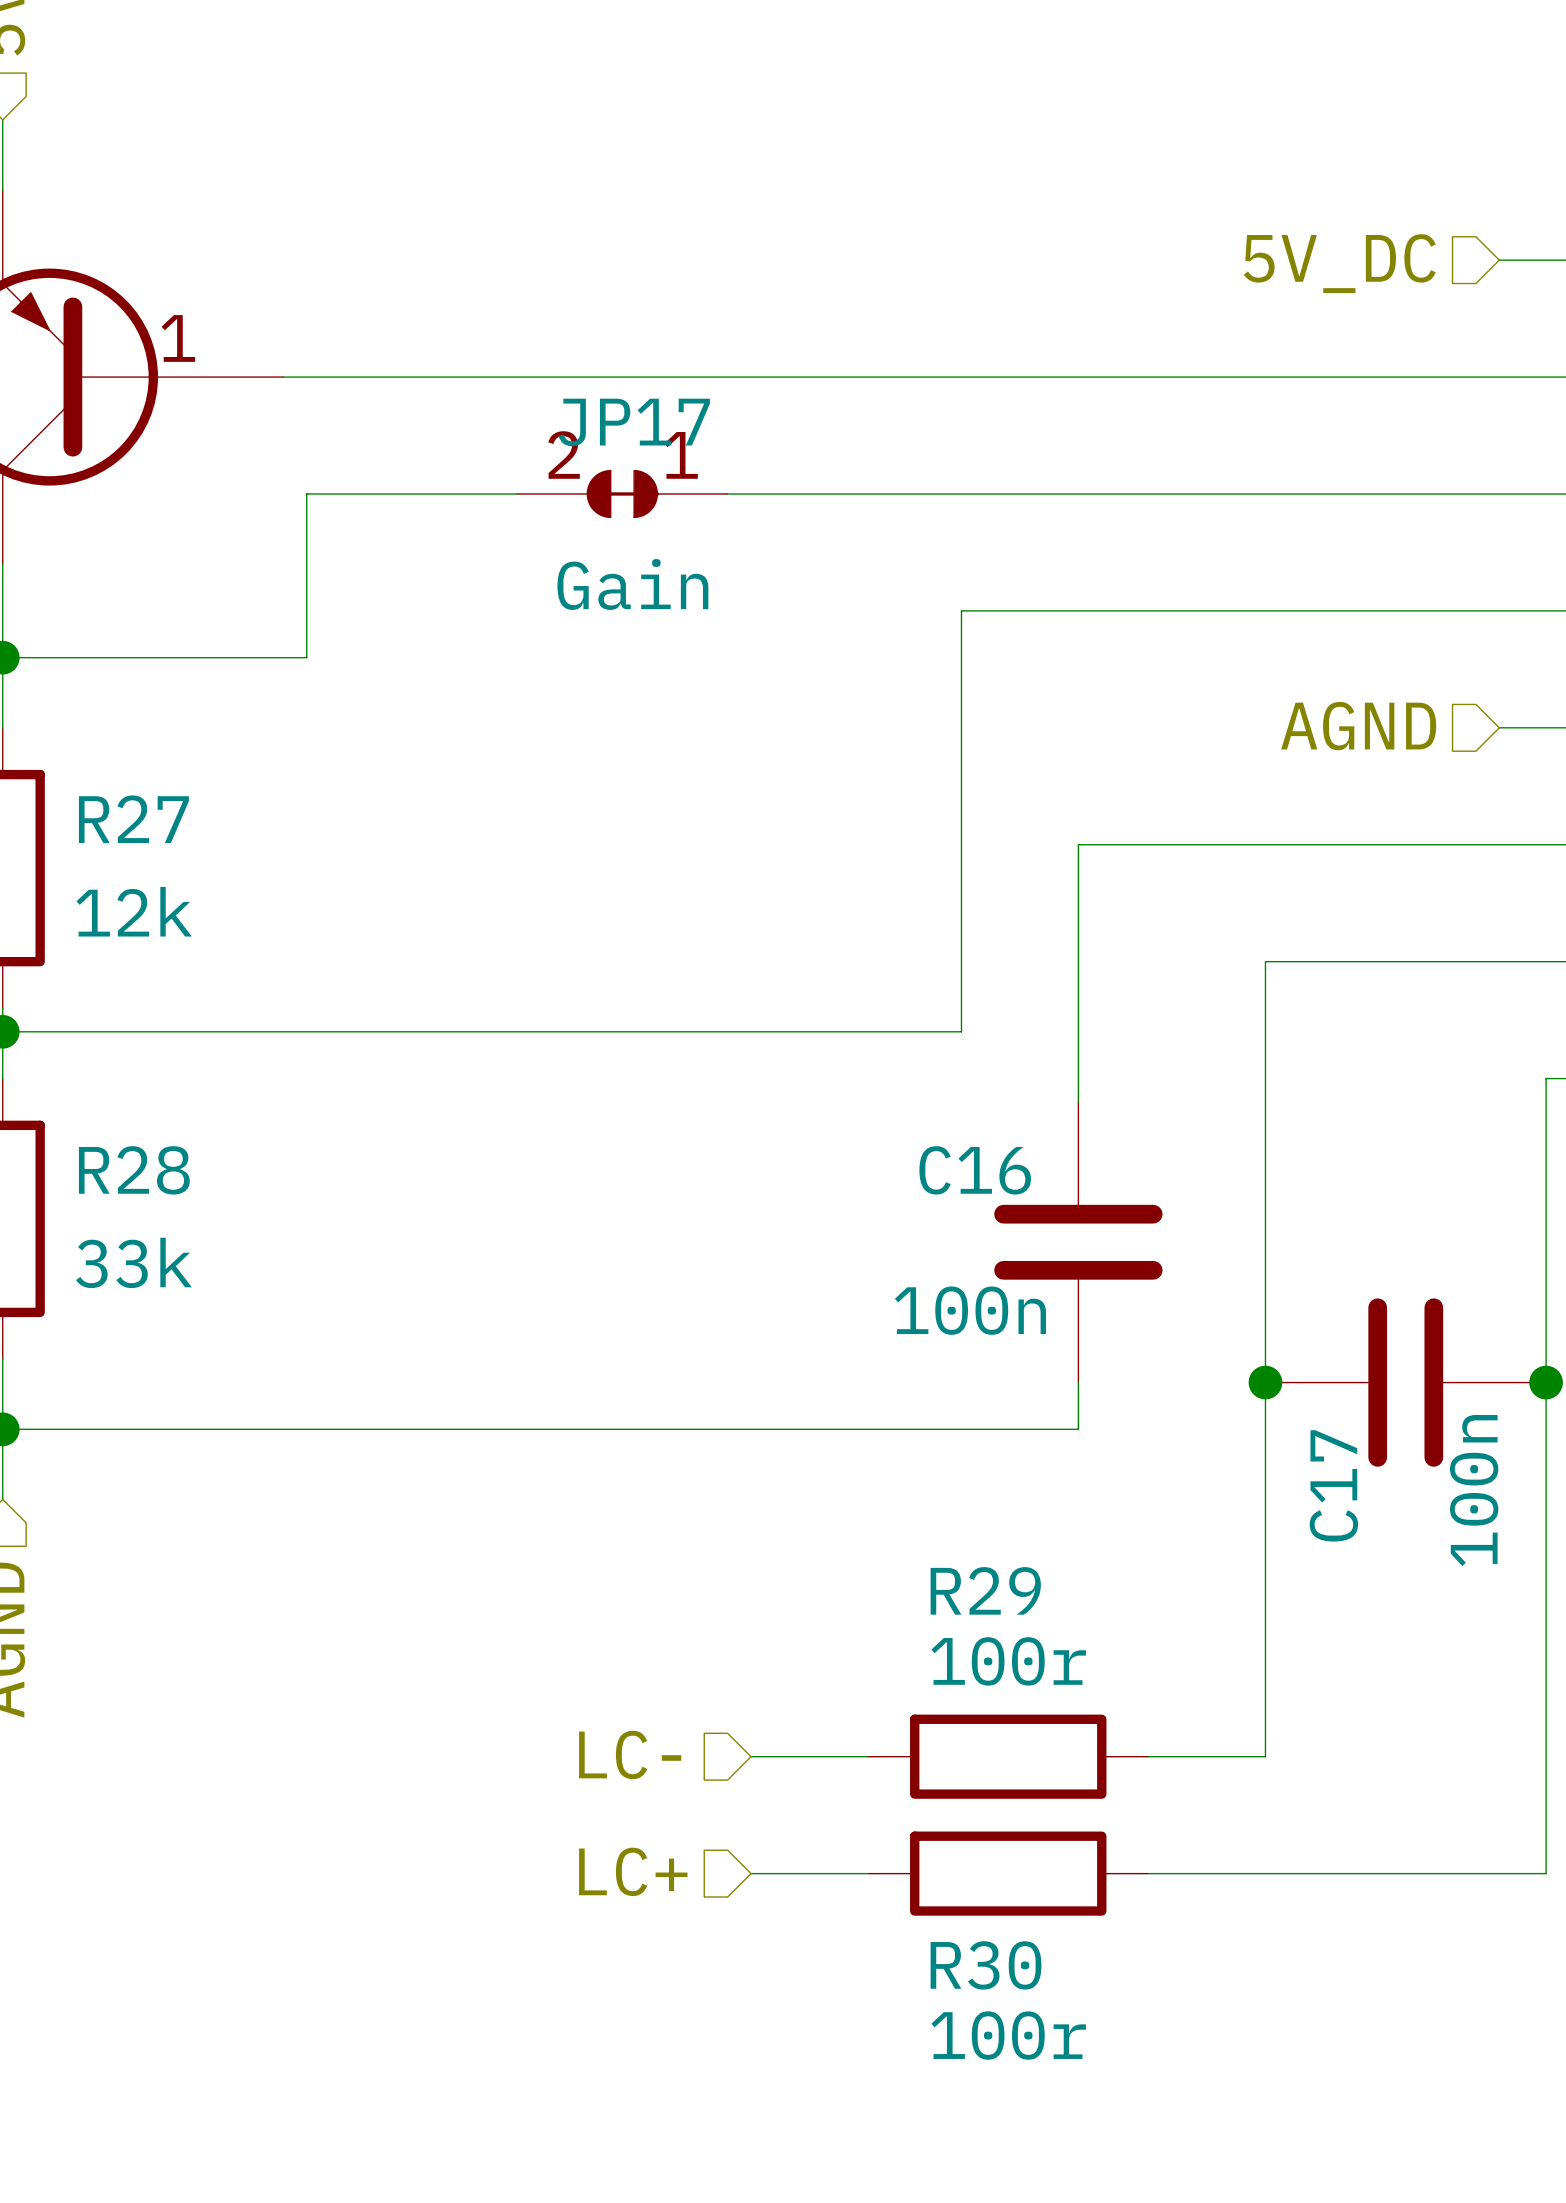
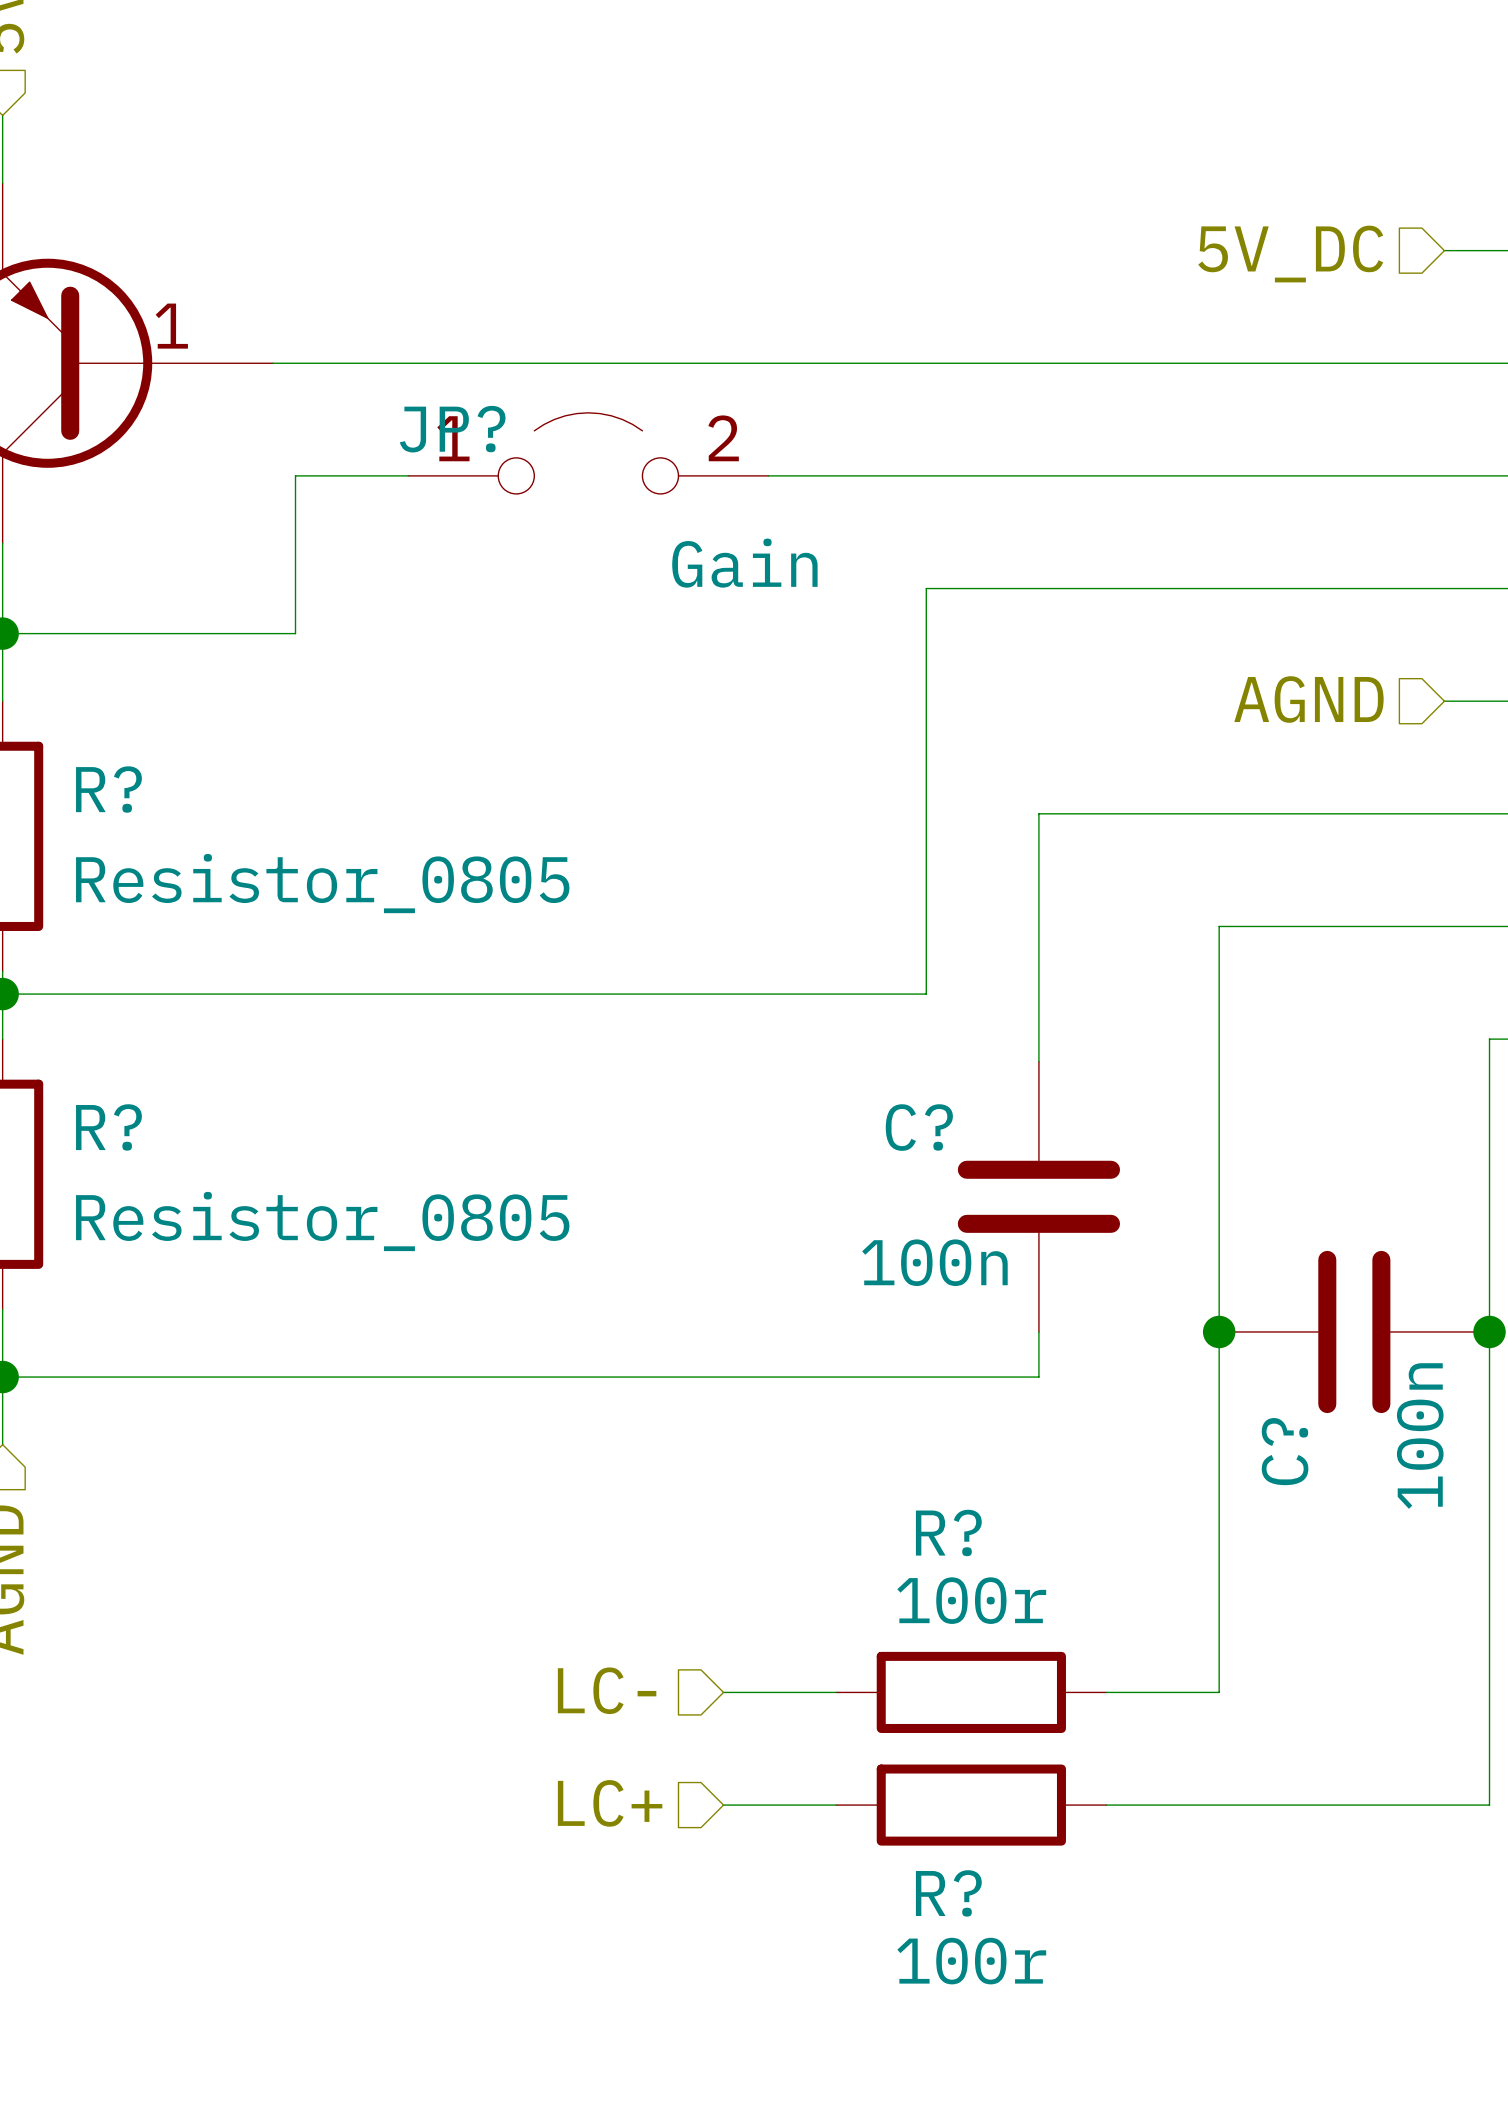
JP?: none -> Gain (588, 453)
JP17: Gain (622, 493) -> none
R27 name: R27 (133, 819) -> R? (108, 789)
R27 value: 12k (134, 911) -> Resistor_0805 (322, 883)
R28 name: R28 (134, 1170) -> R? (108, 1127)
C16 name: C16 (975, 1170) -> C? (919, 1127)
R28 value: 33k (133, 1262) -> Resistor_0805 (322, 1221)
C17 name: C17 (1333, 1485) -> C? (1285, 1451)
R29 name: R29 (985, 1590) -> R? (948, 1532)
R30 name: R30 (986, 1965) -> R? (948, 1893)

